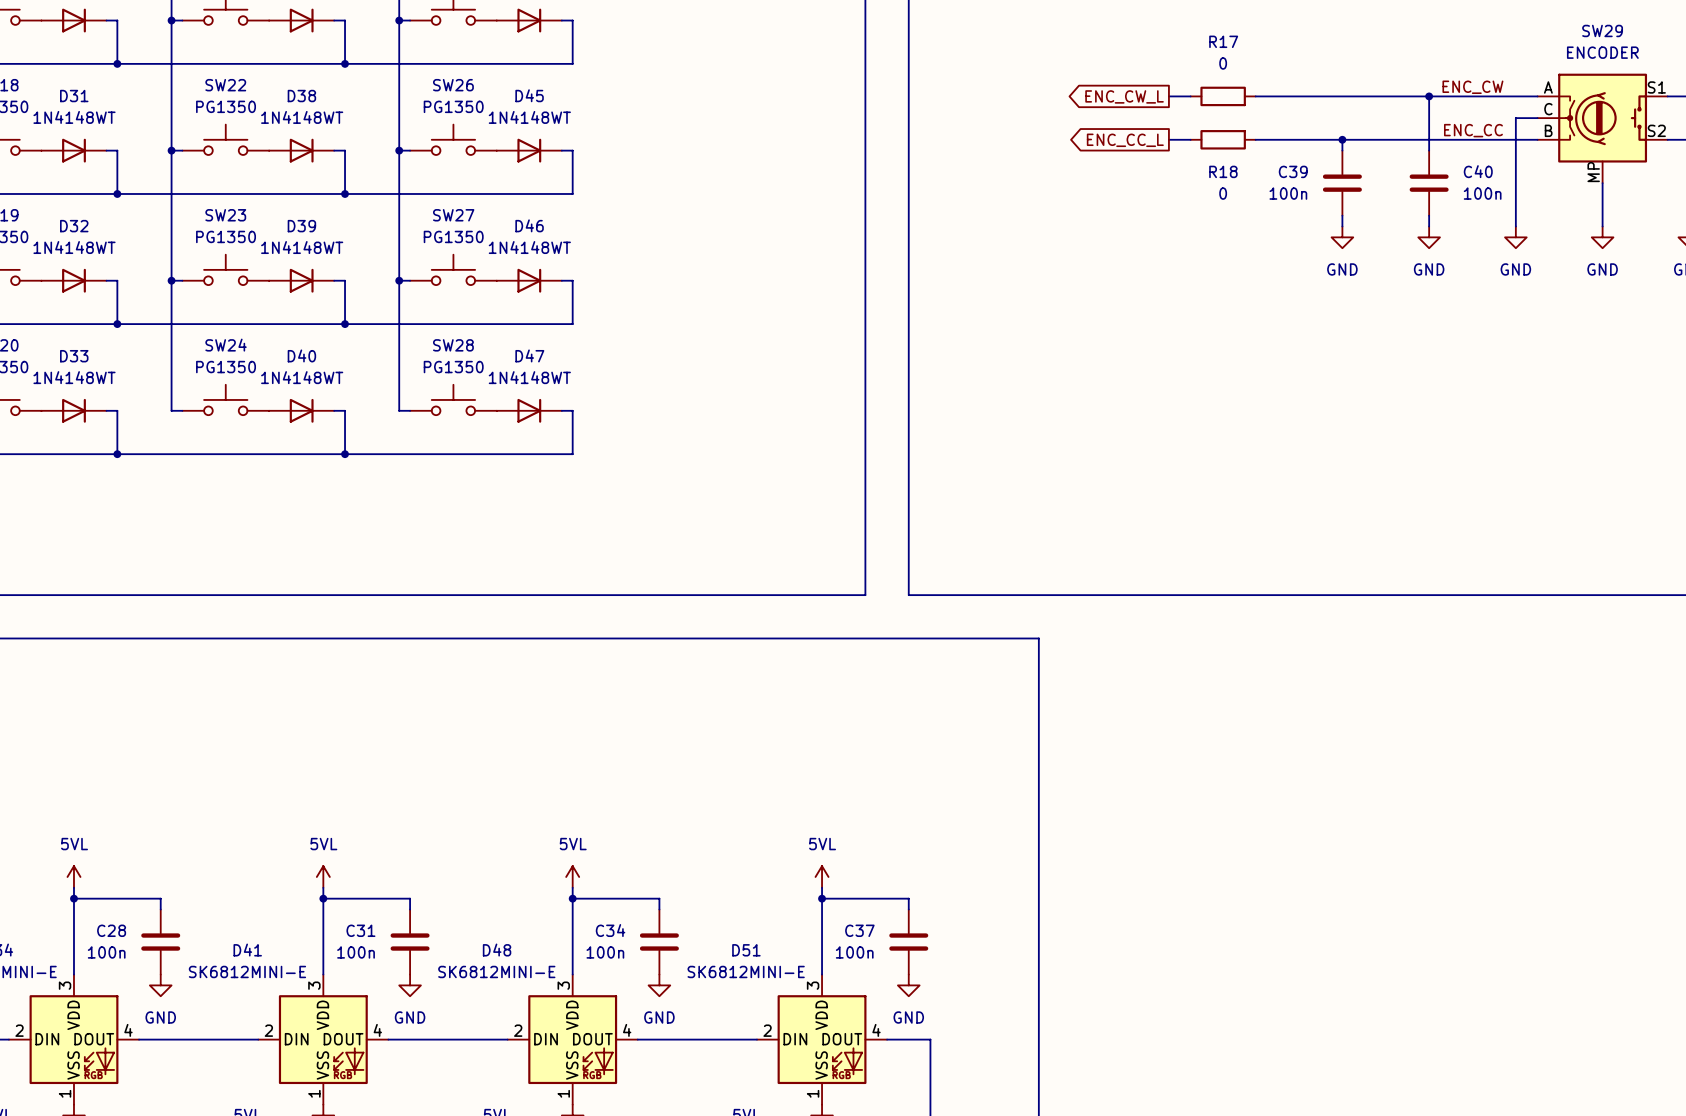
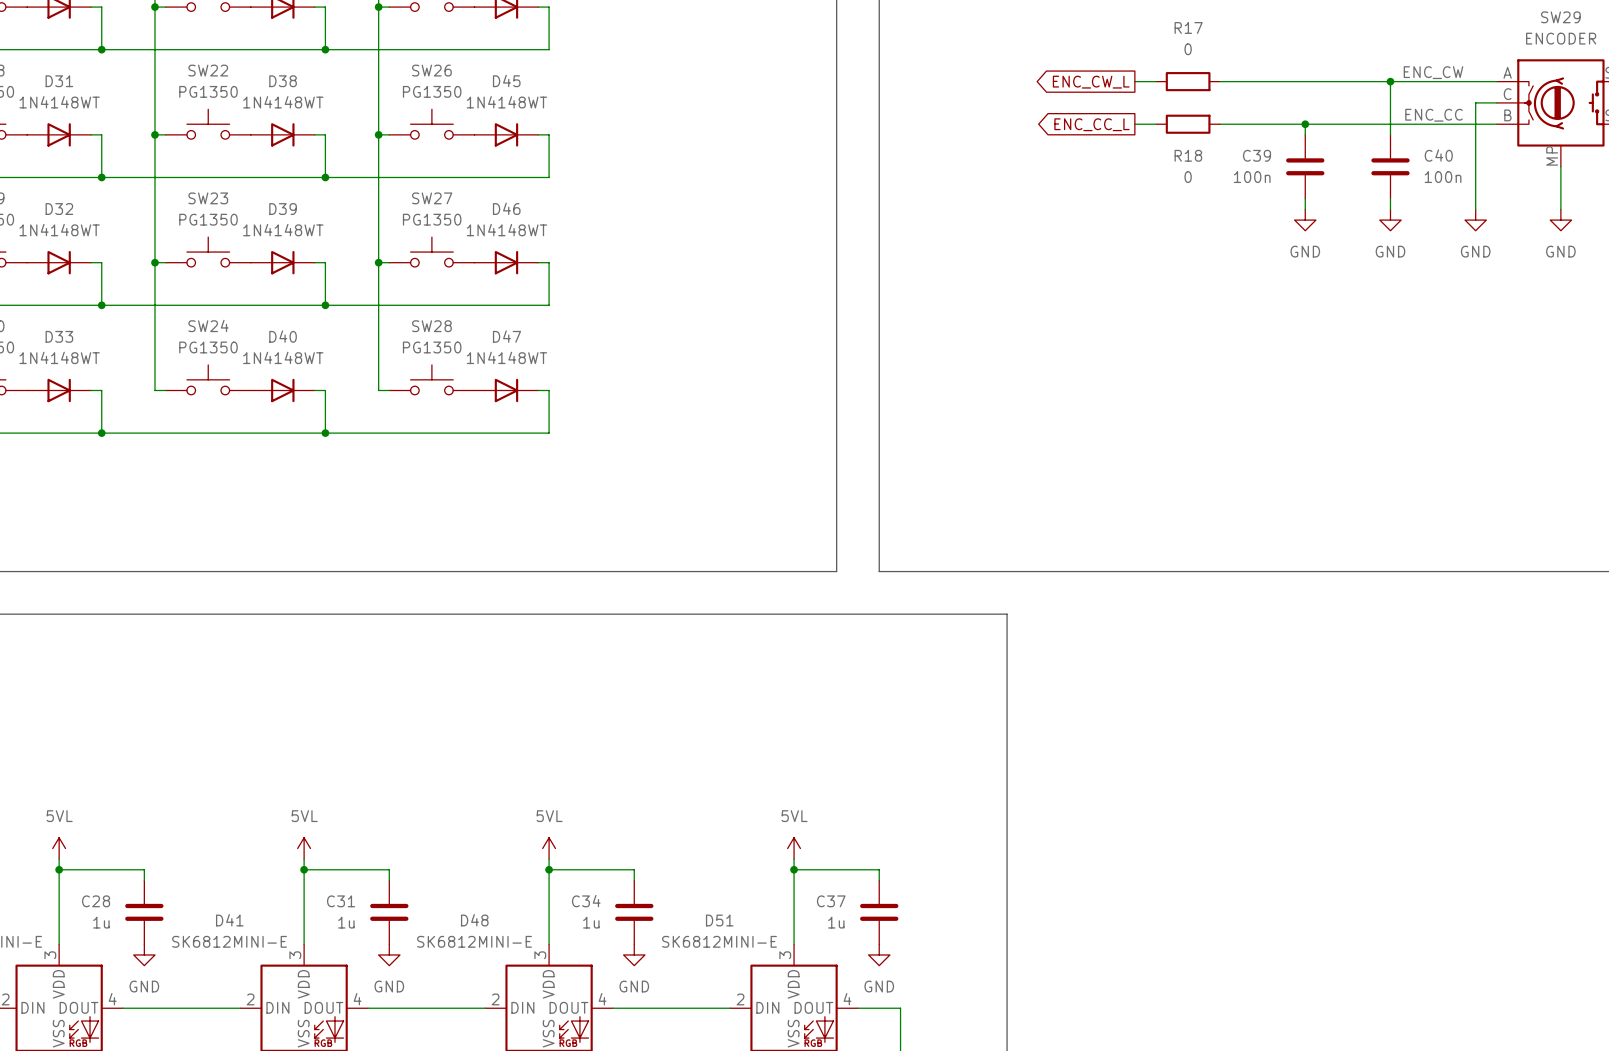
C28 value: 100n (106, 952) -> 1u (101, 922)
C31 value: 100n (356, 952) -> 1u (346, 922)
C34 value: 100n (605, 952) -> 1u (591, 922)
C37 value: 100n (854, 952) -> 1u (836, 922)

